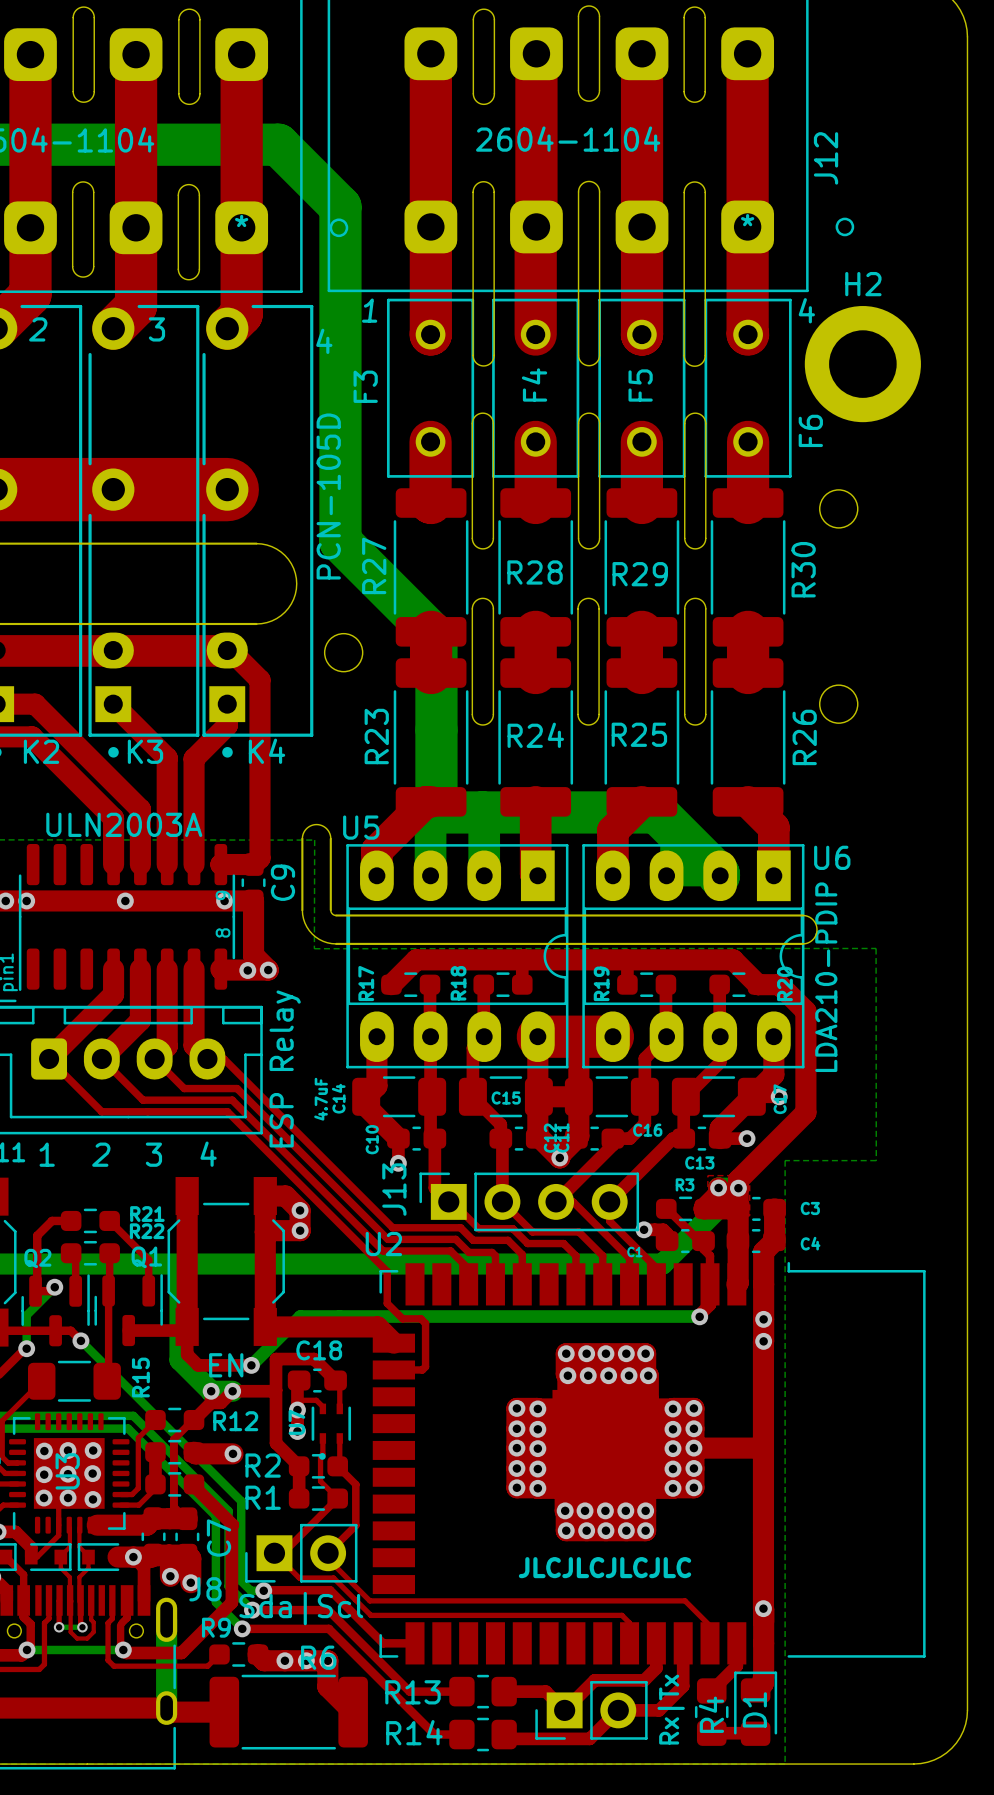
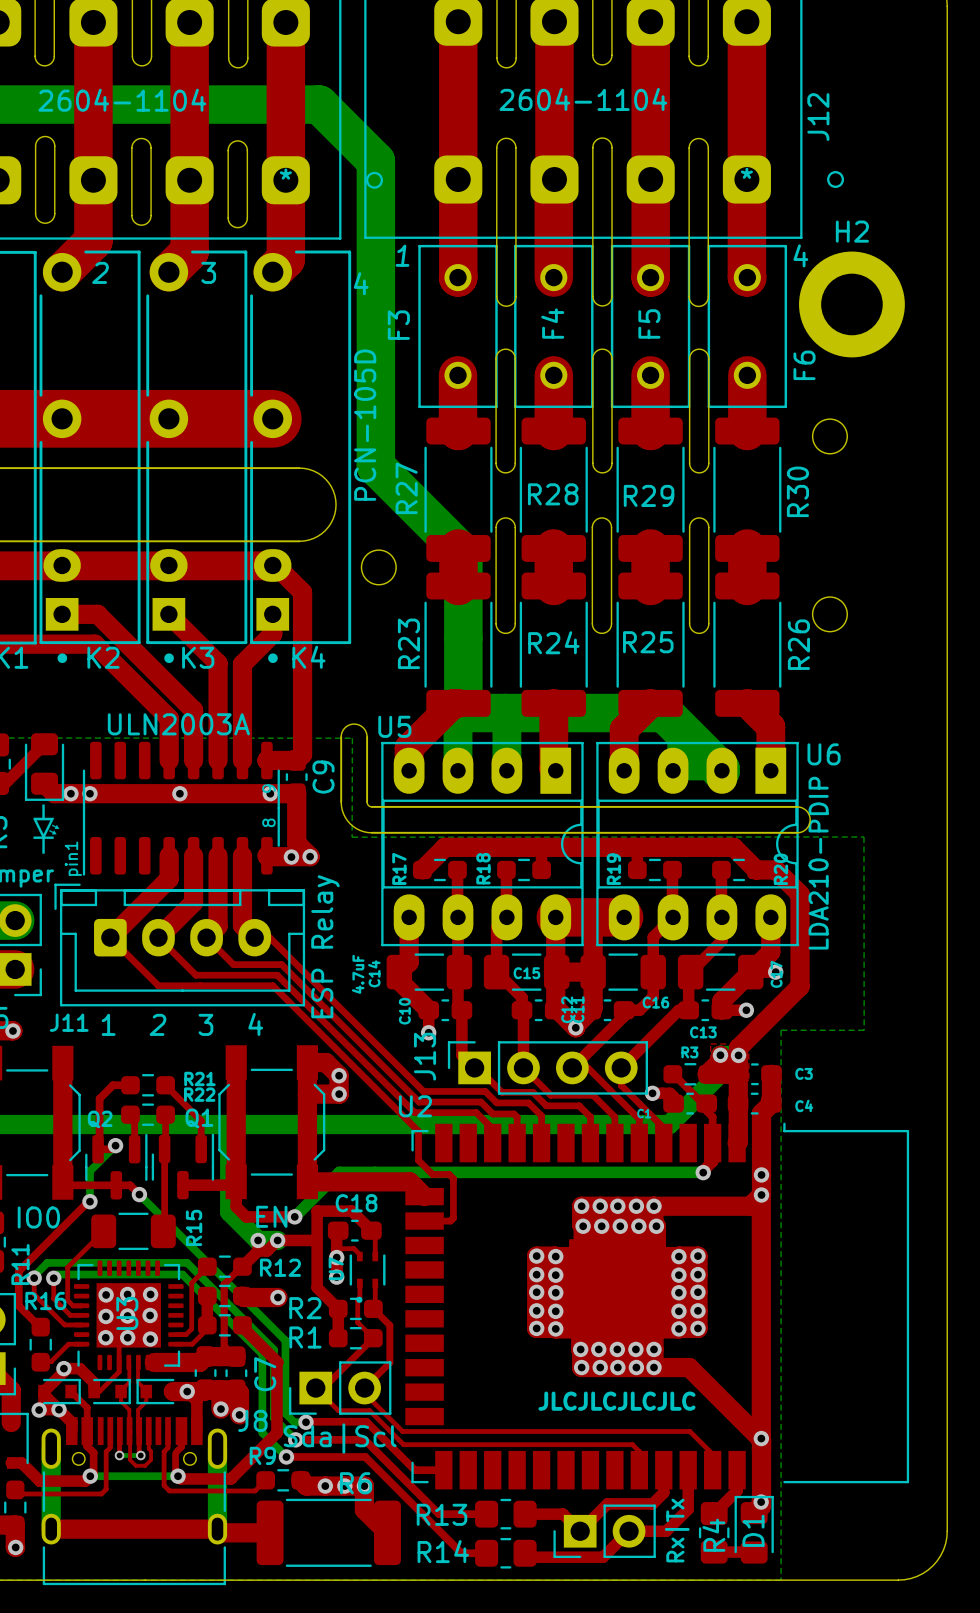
top track: none -> (761, 1195) (750, 1206) (653, 1206)
top track: (693, 1448) (763, 1448) -> none
top track: none -> (653, 1367) (689, 1367) (761, 1439)
via: none -> (761, 1502)

